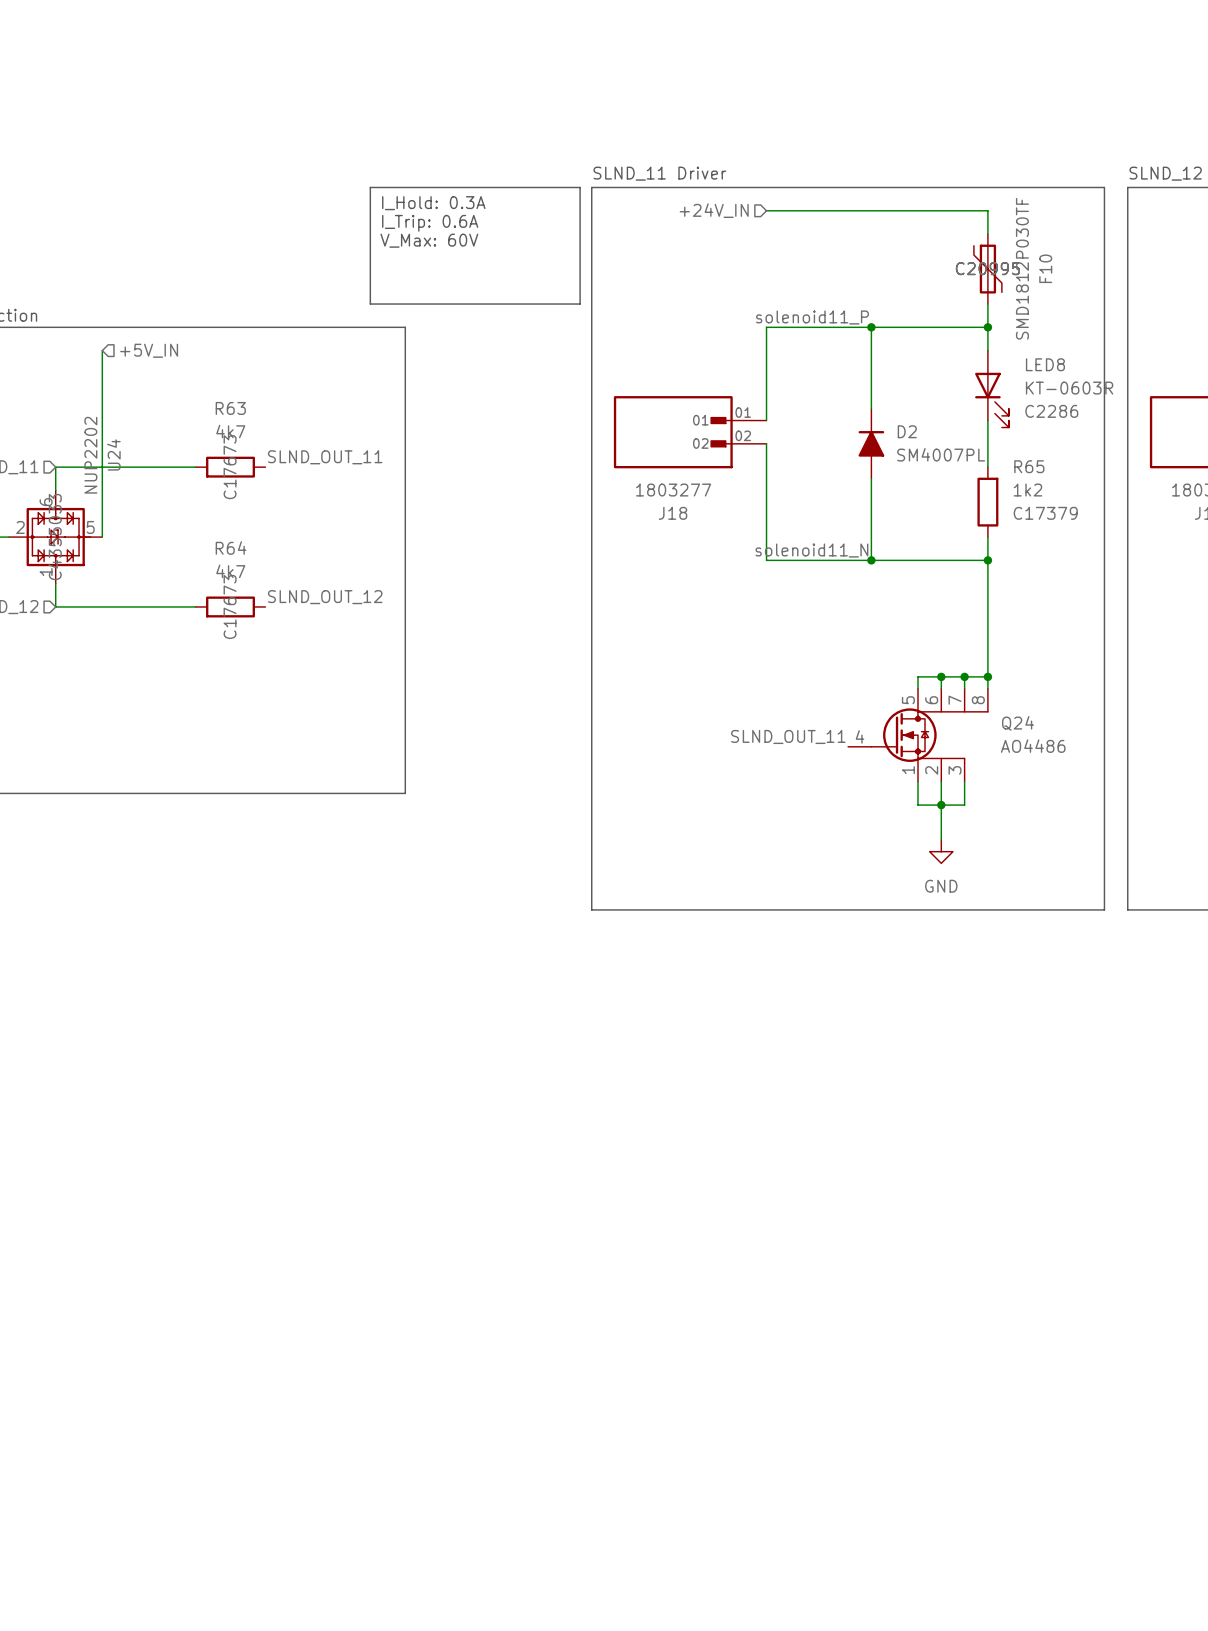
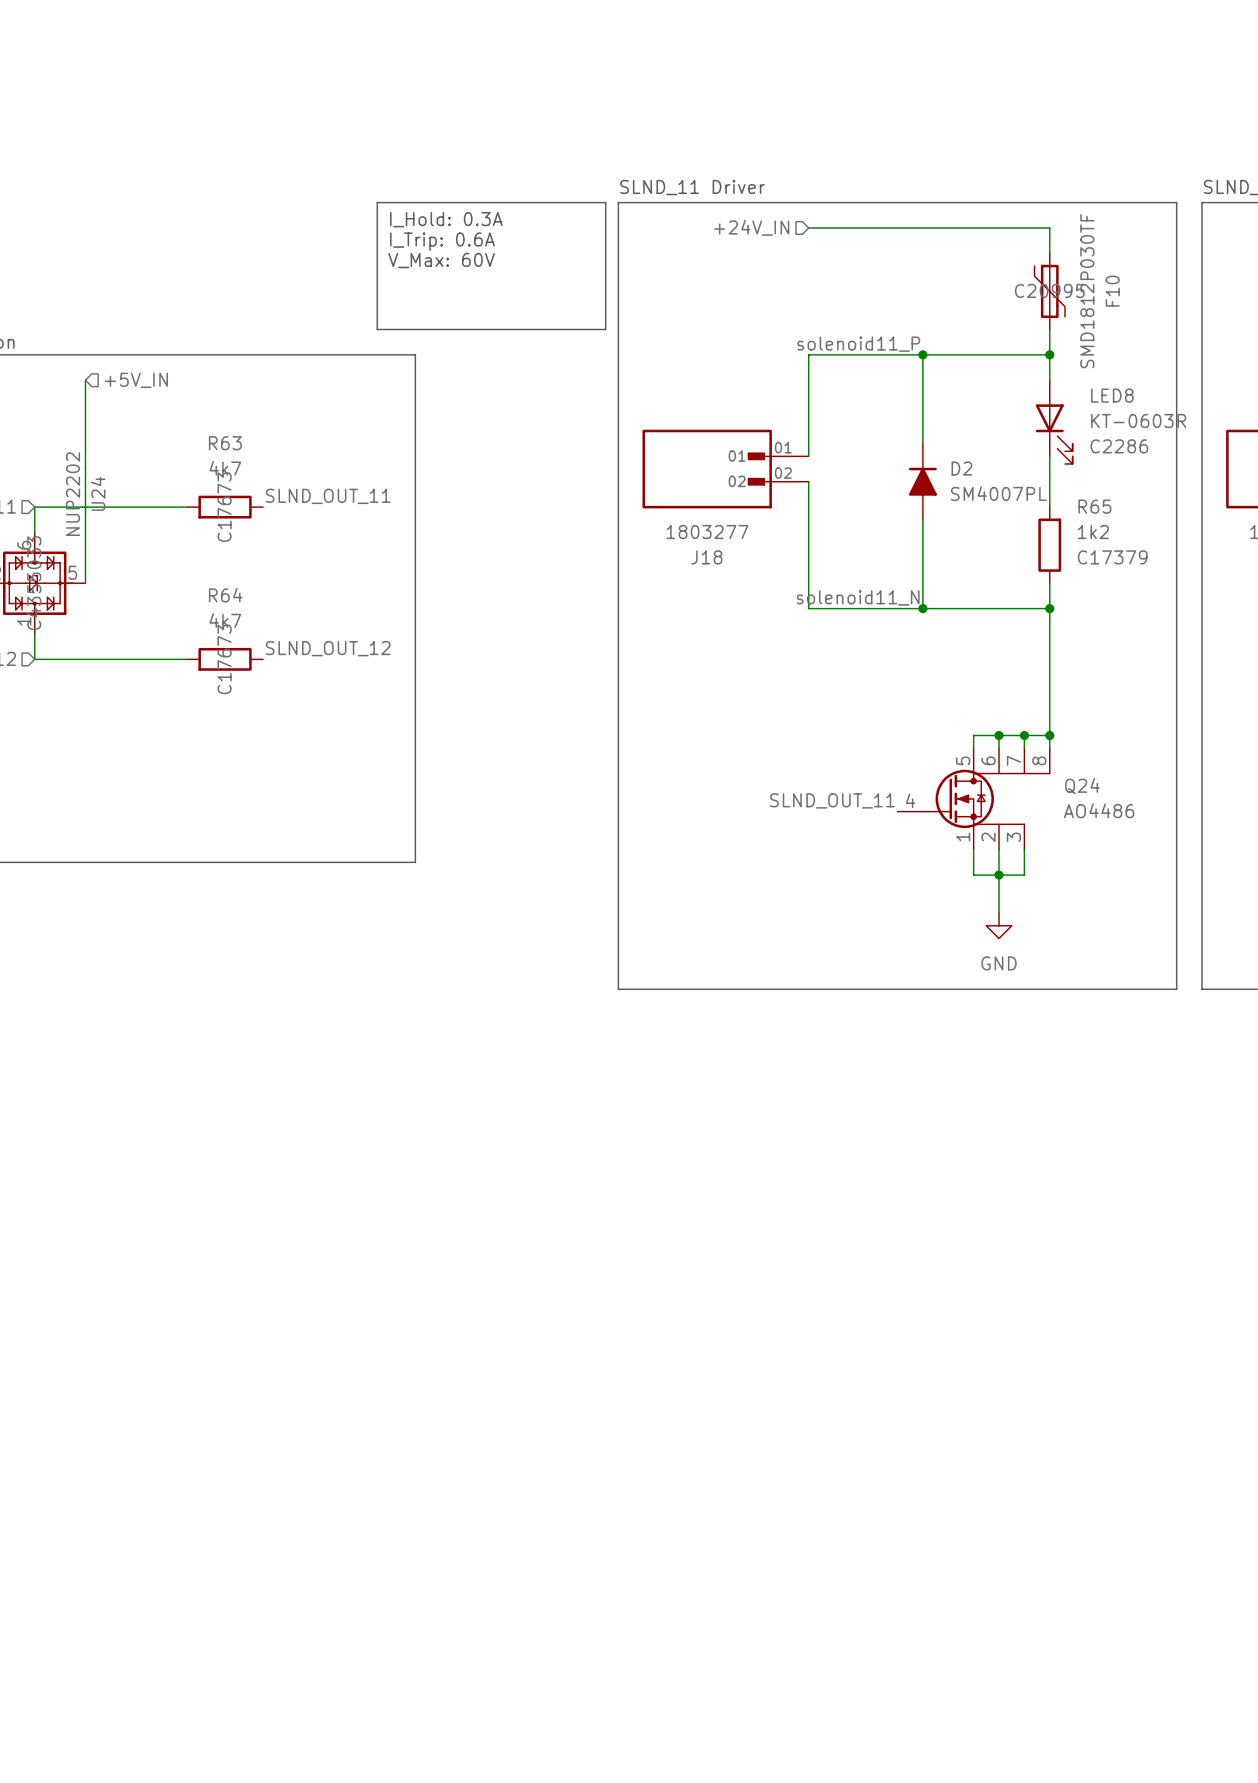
F10 text: C20995 (987, 268) -> none

